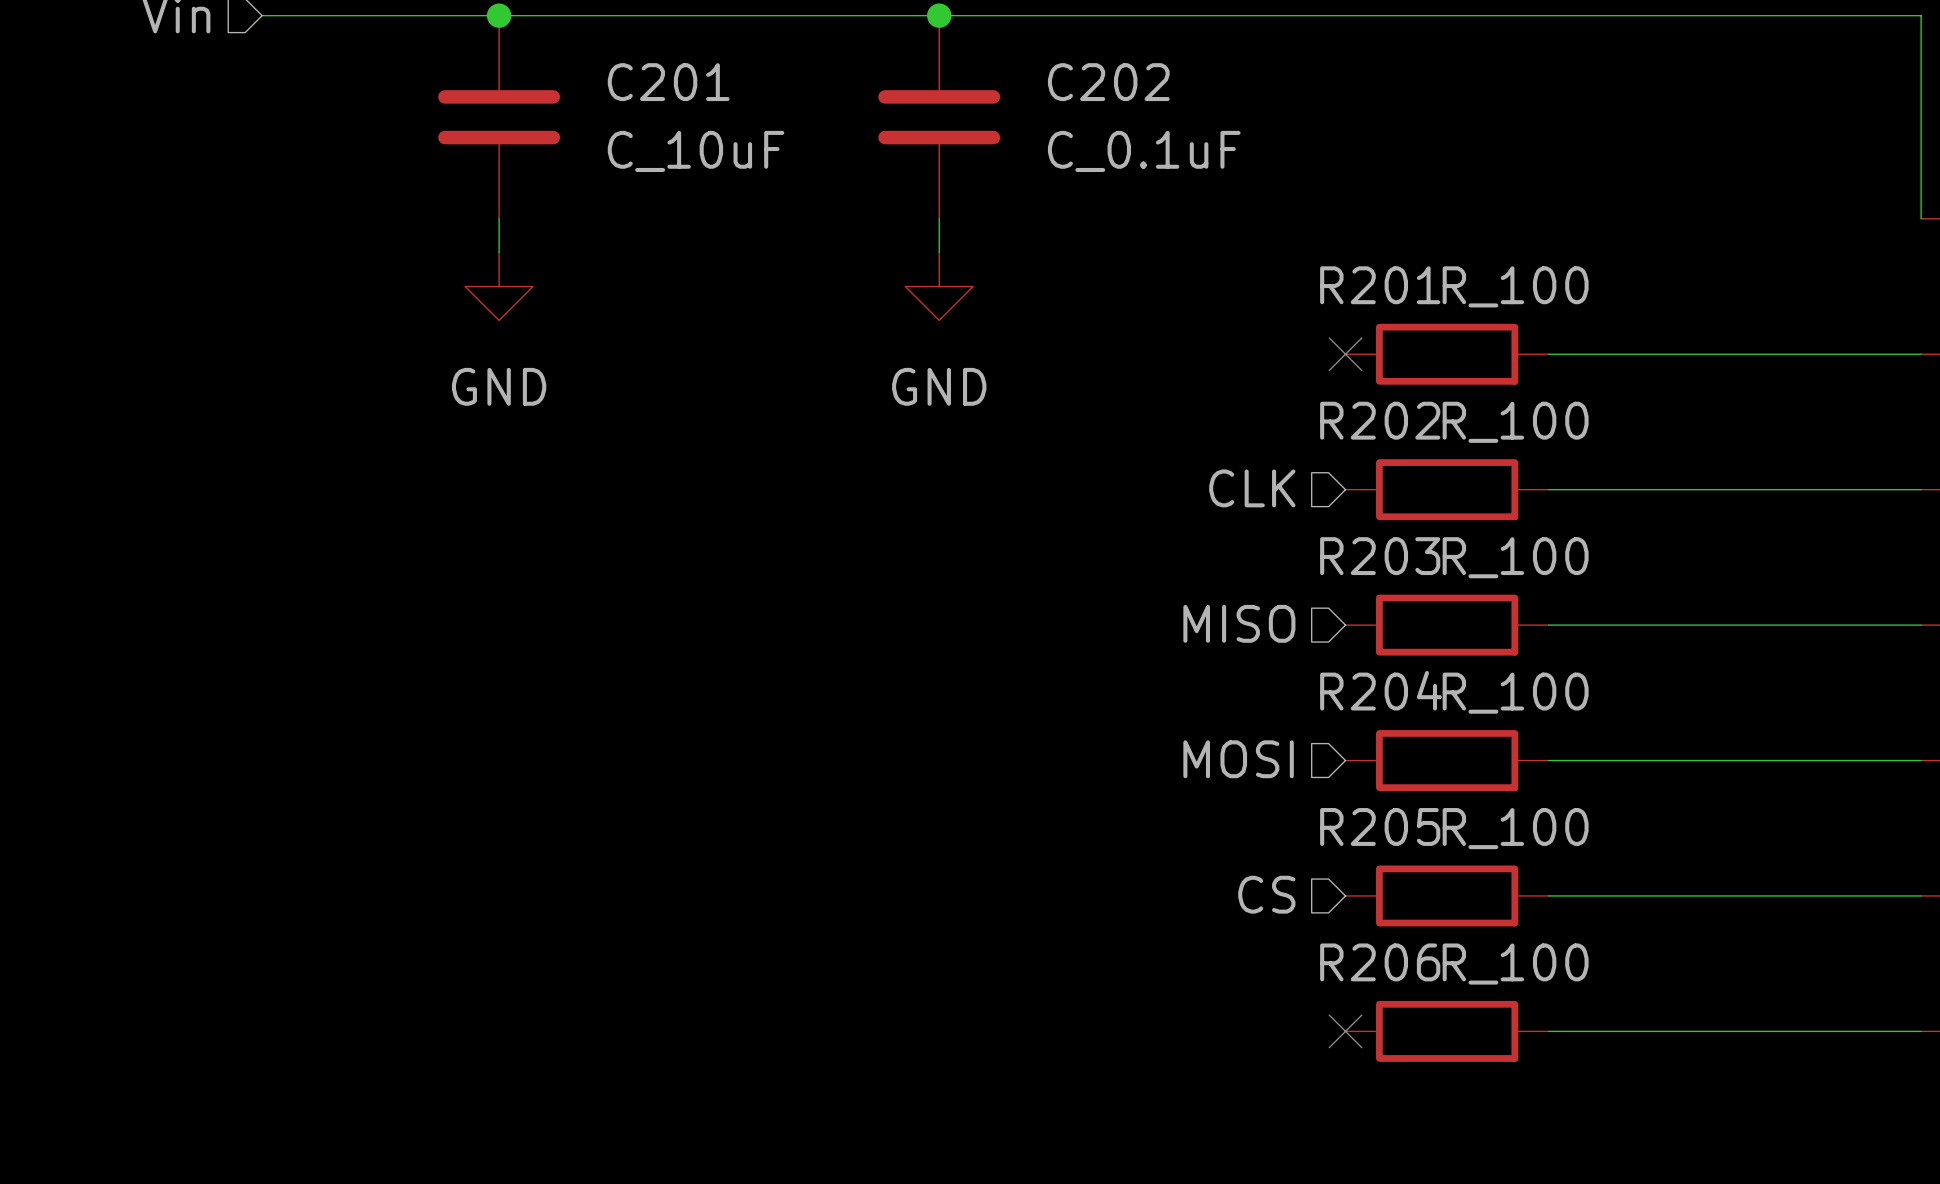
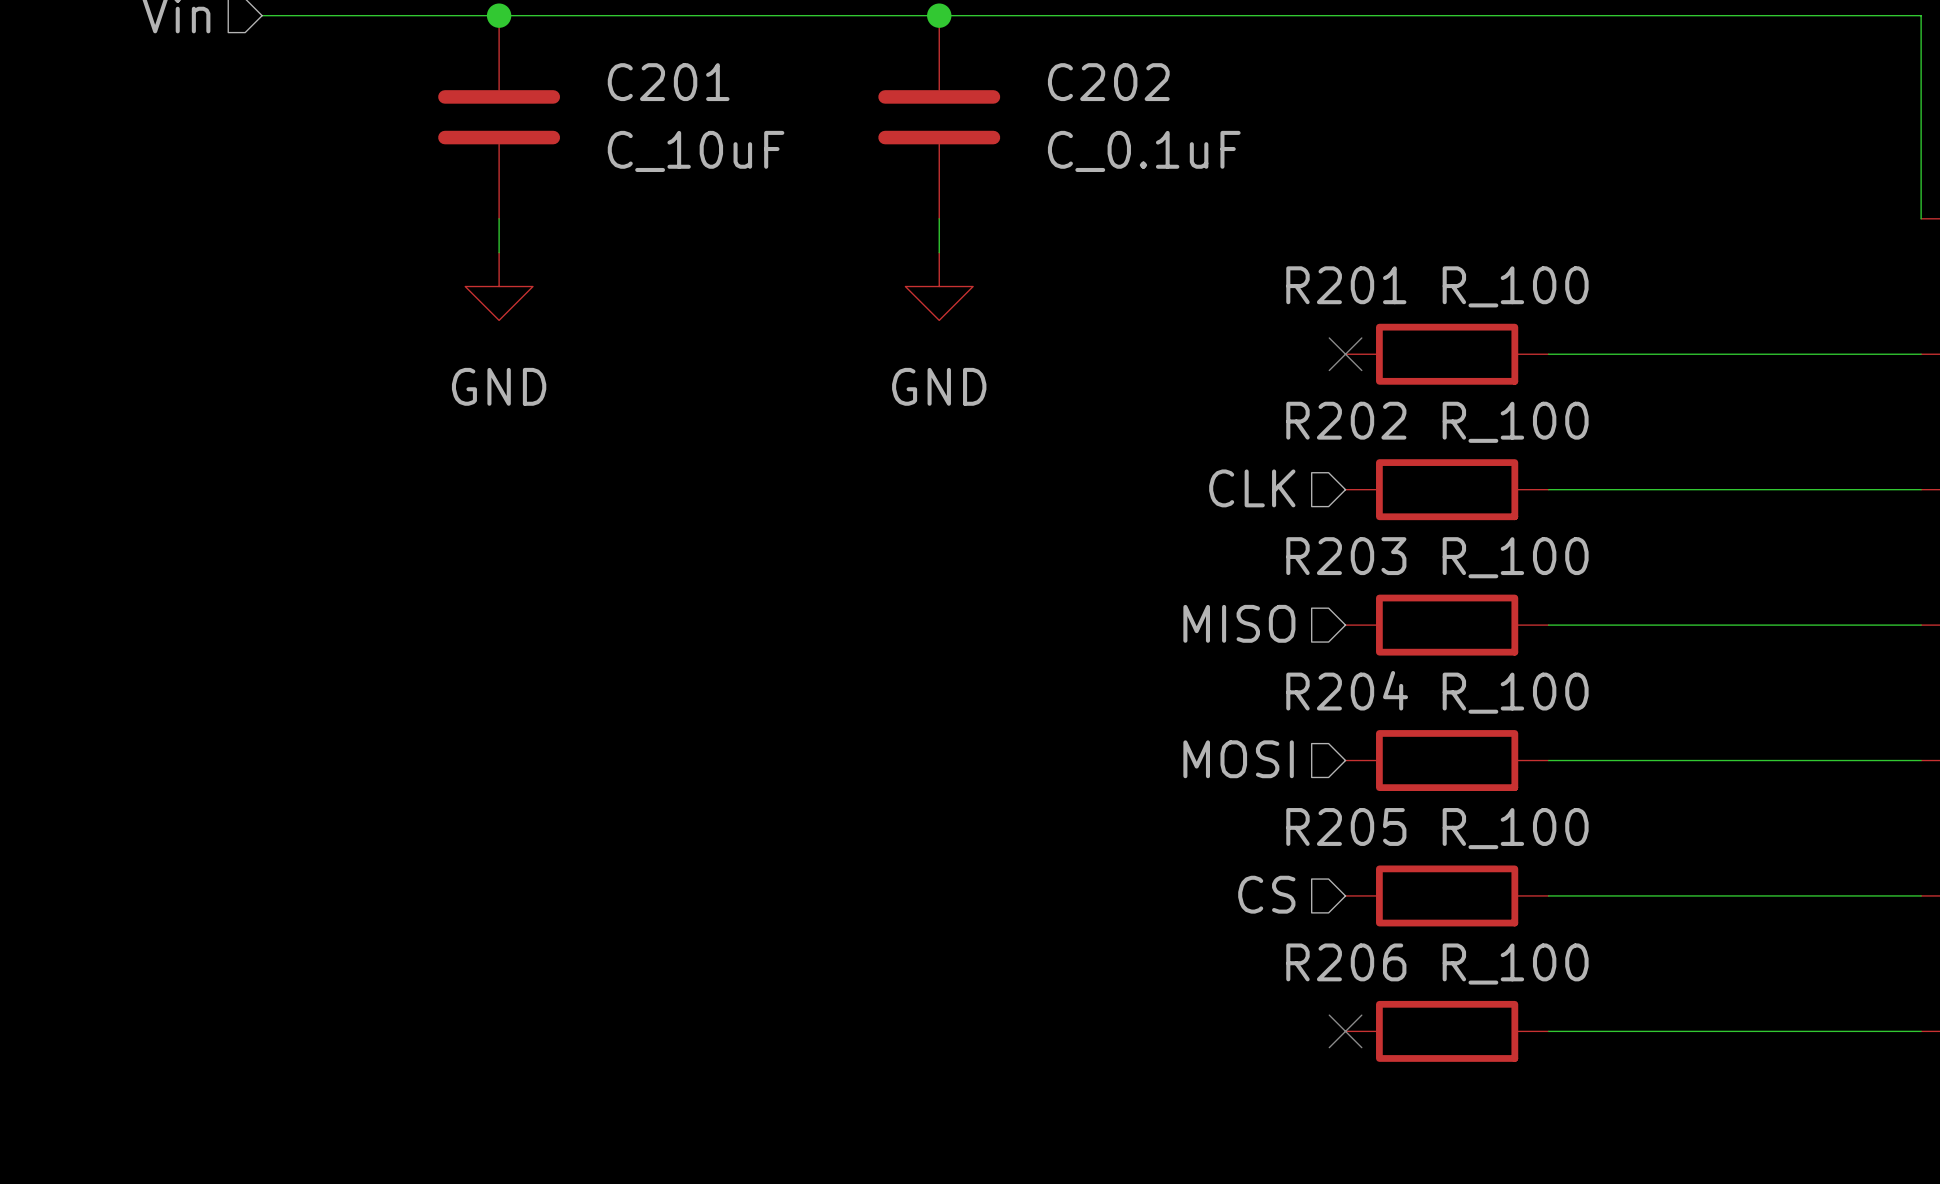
R201 name position: R201 (1380, 285) -> R201 (1346, 285)
R202 name position: R202 (1380, 420) -> R202 (1346, 420)
R203 name position: R203 (1380, 556) -> R203 (1346, 556)
R204 name position: R204 (1381, 690) -> R204 (1347, 690)
R205 name position: R205 (1380, 826) -> R205 (1346, 826)
R206 name position: R206 (1380, 962) -> R206 (1346, 962)

